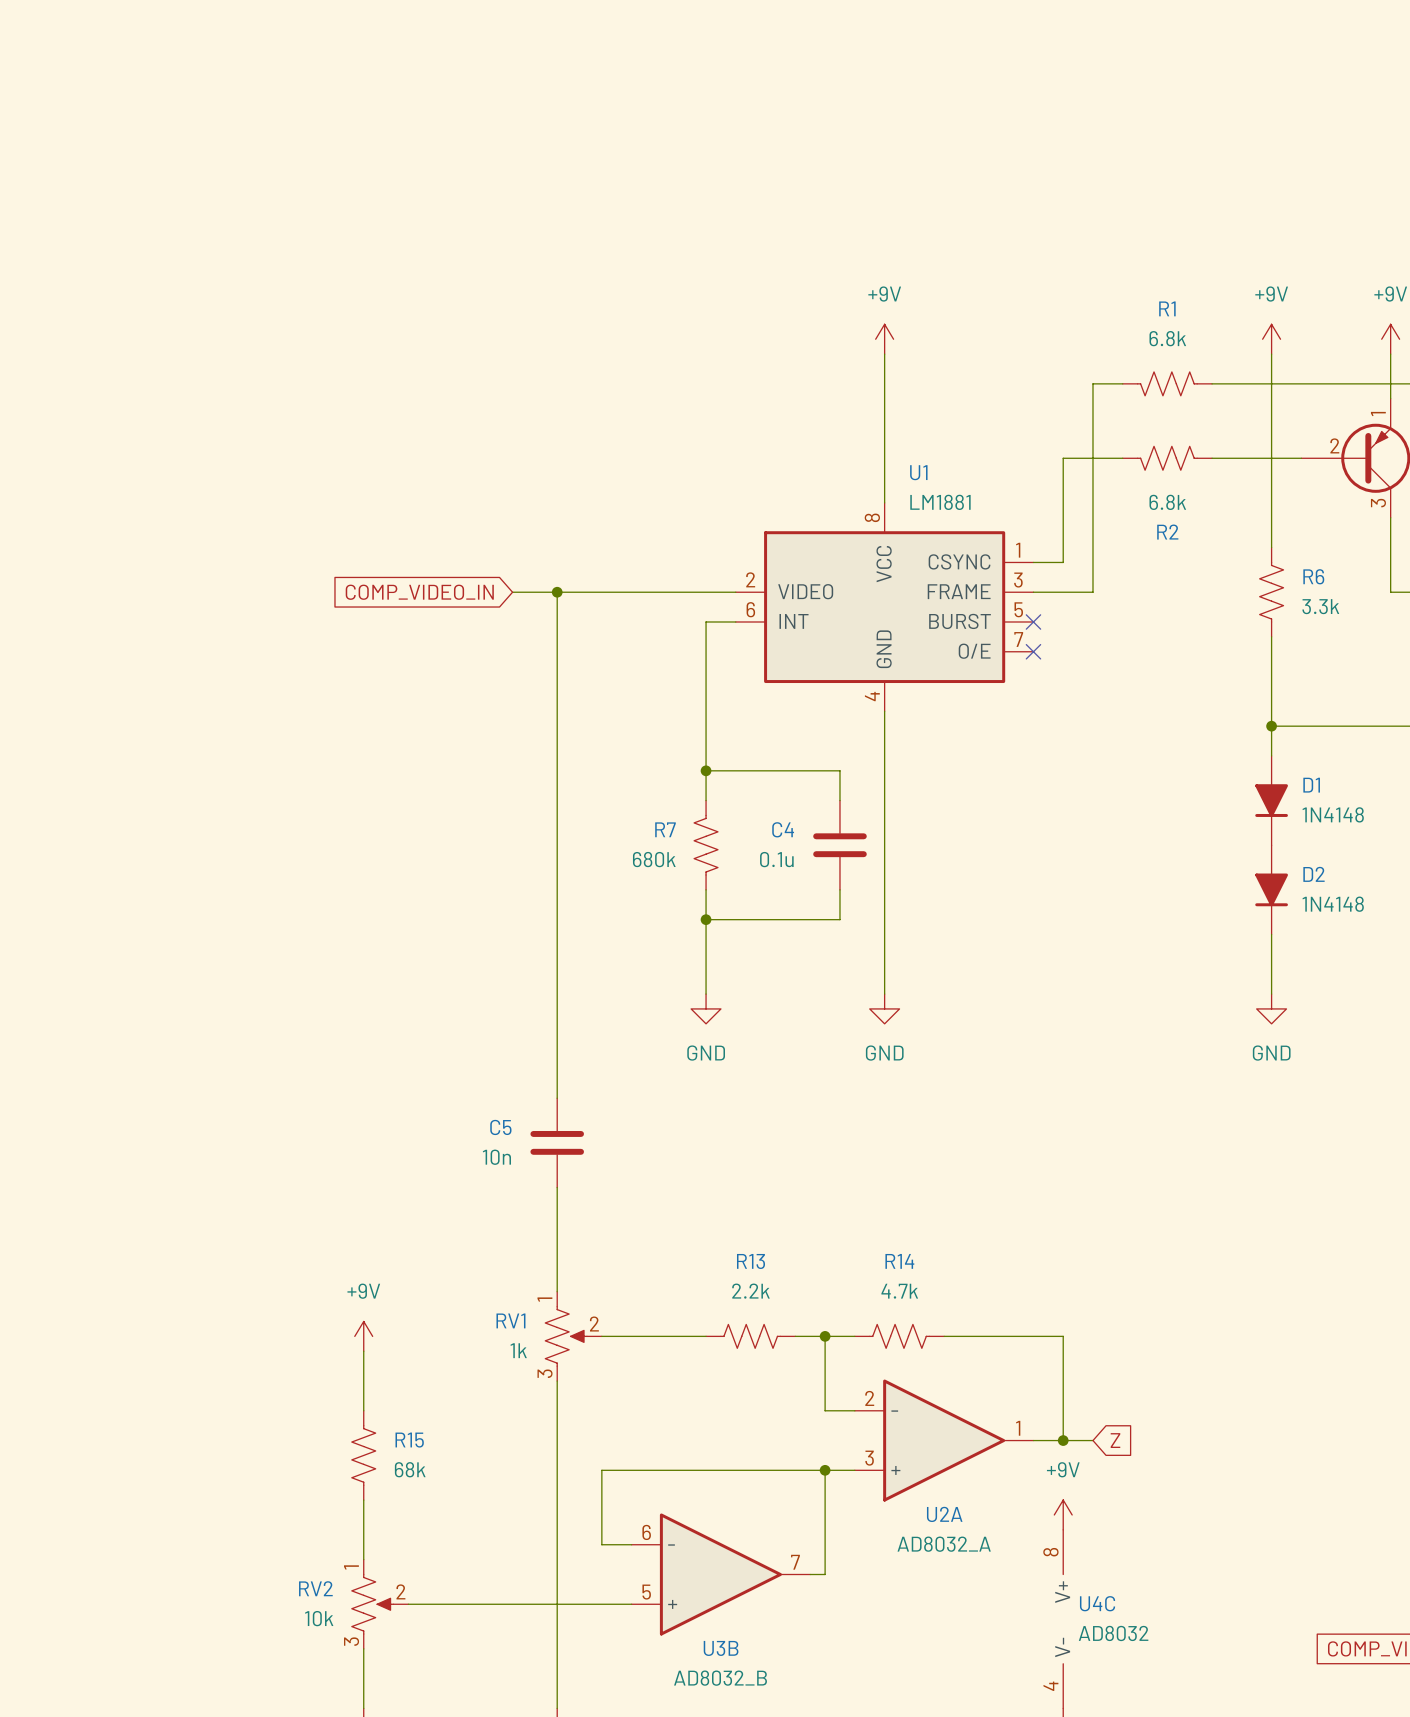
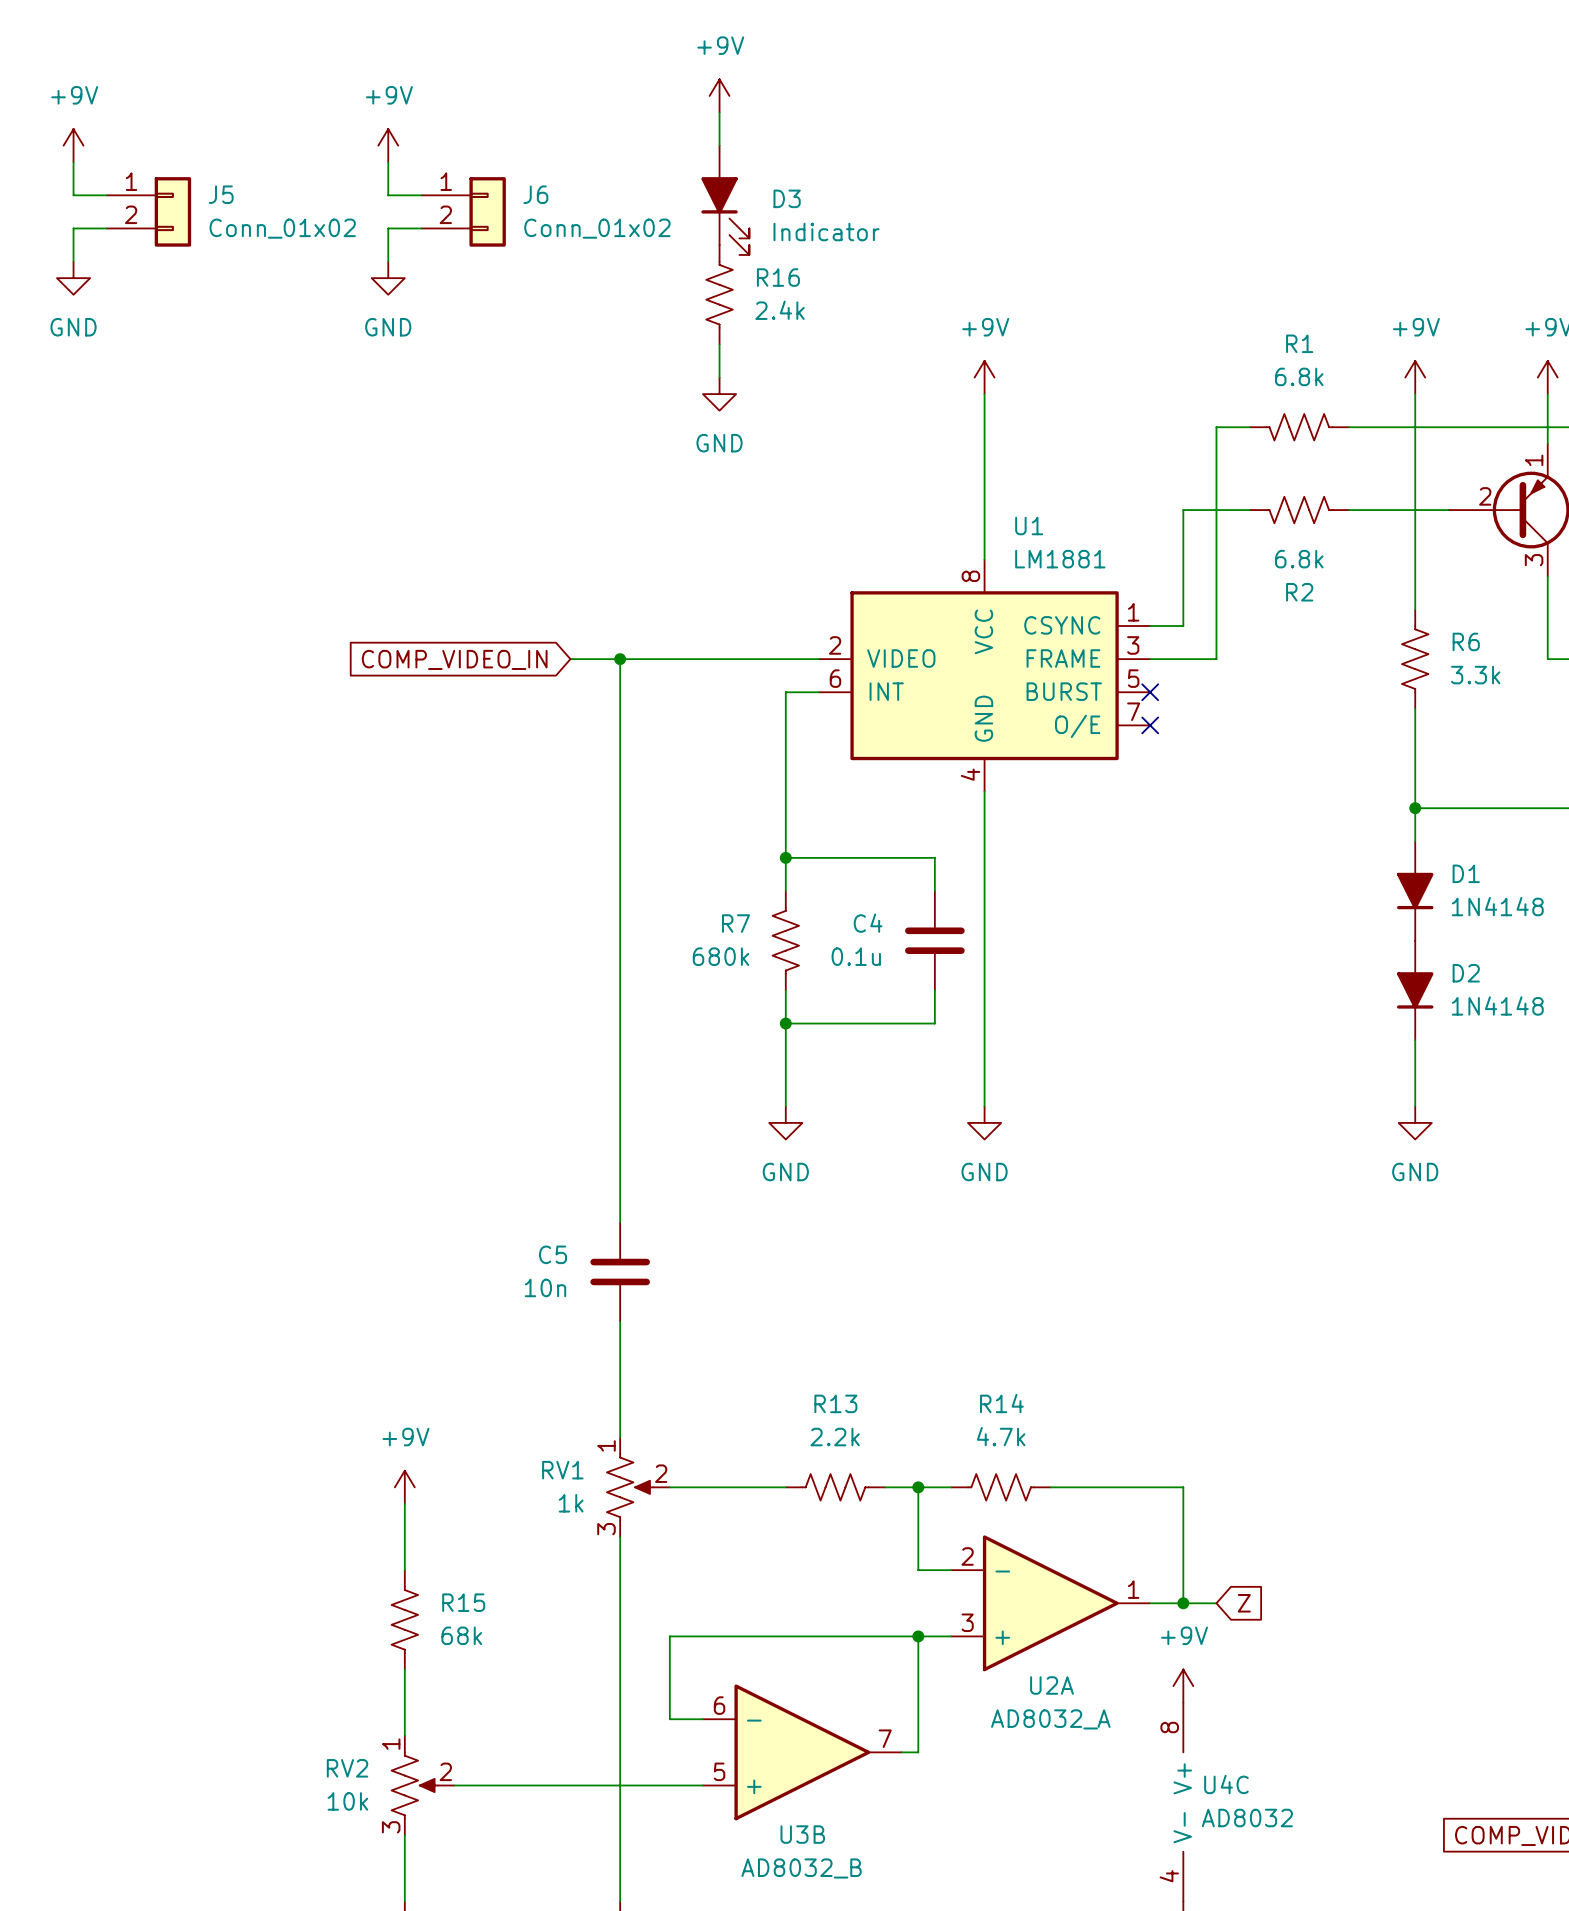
power symbol: none -> +9V (719, 95)
wire: none -> (719, 112) (719, 145)
power symbol: none -> +9V (73, 145)
power symbol: none -> +9V (388, 145)
wire: none -> (73, 162) (73, 195) (106, 195)
wire: none -> (388, 162) (388, 195) (421, 195)
D3: none -> Indicator (725, 200)
J5: none -> Conn_01x02 (148, 211)
J6: none -> Conn_01x02 (463, 211)
wire: none -> (106, 228) (73, 228) (73, 261)
wire: none -> (421, 228) (388, 228) (388, 261)
power symbol: none -> GND (73, 278)
power symbol: none -> GND (388, 278)
R16: none -> 2.4k (719, 294)
wire: none -> (719, 344) (719, 377)
power symbol: none -> GND (719, 394)

